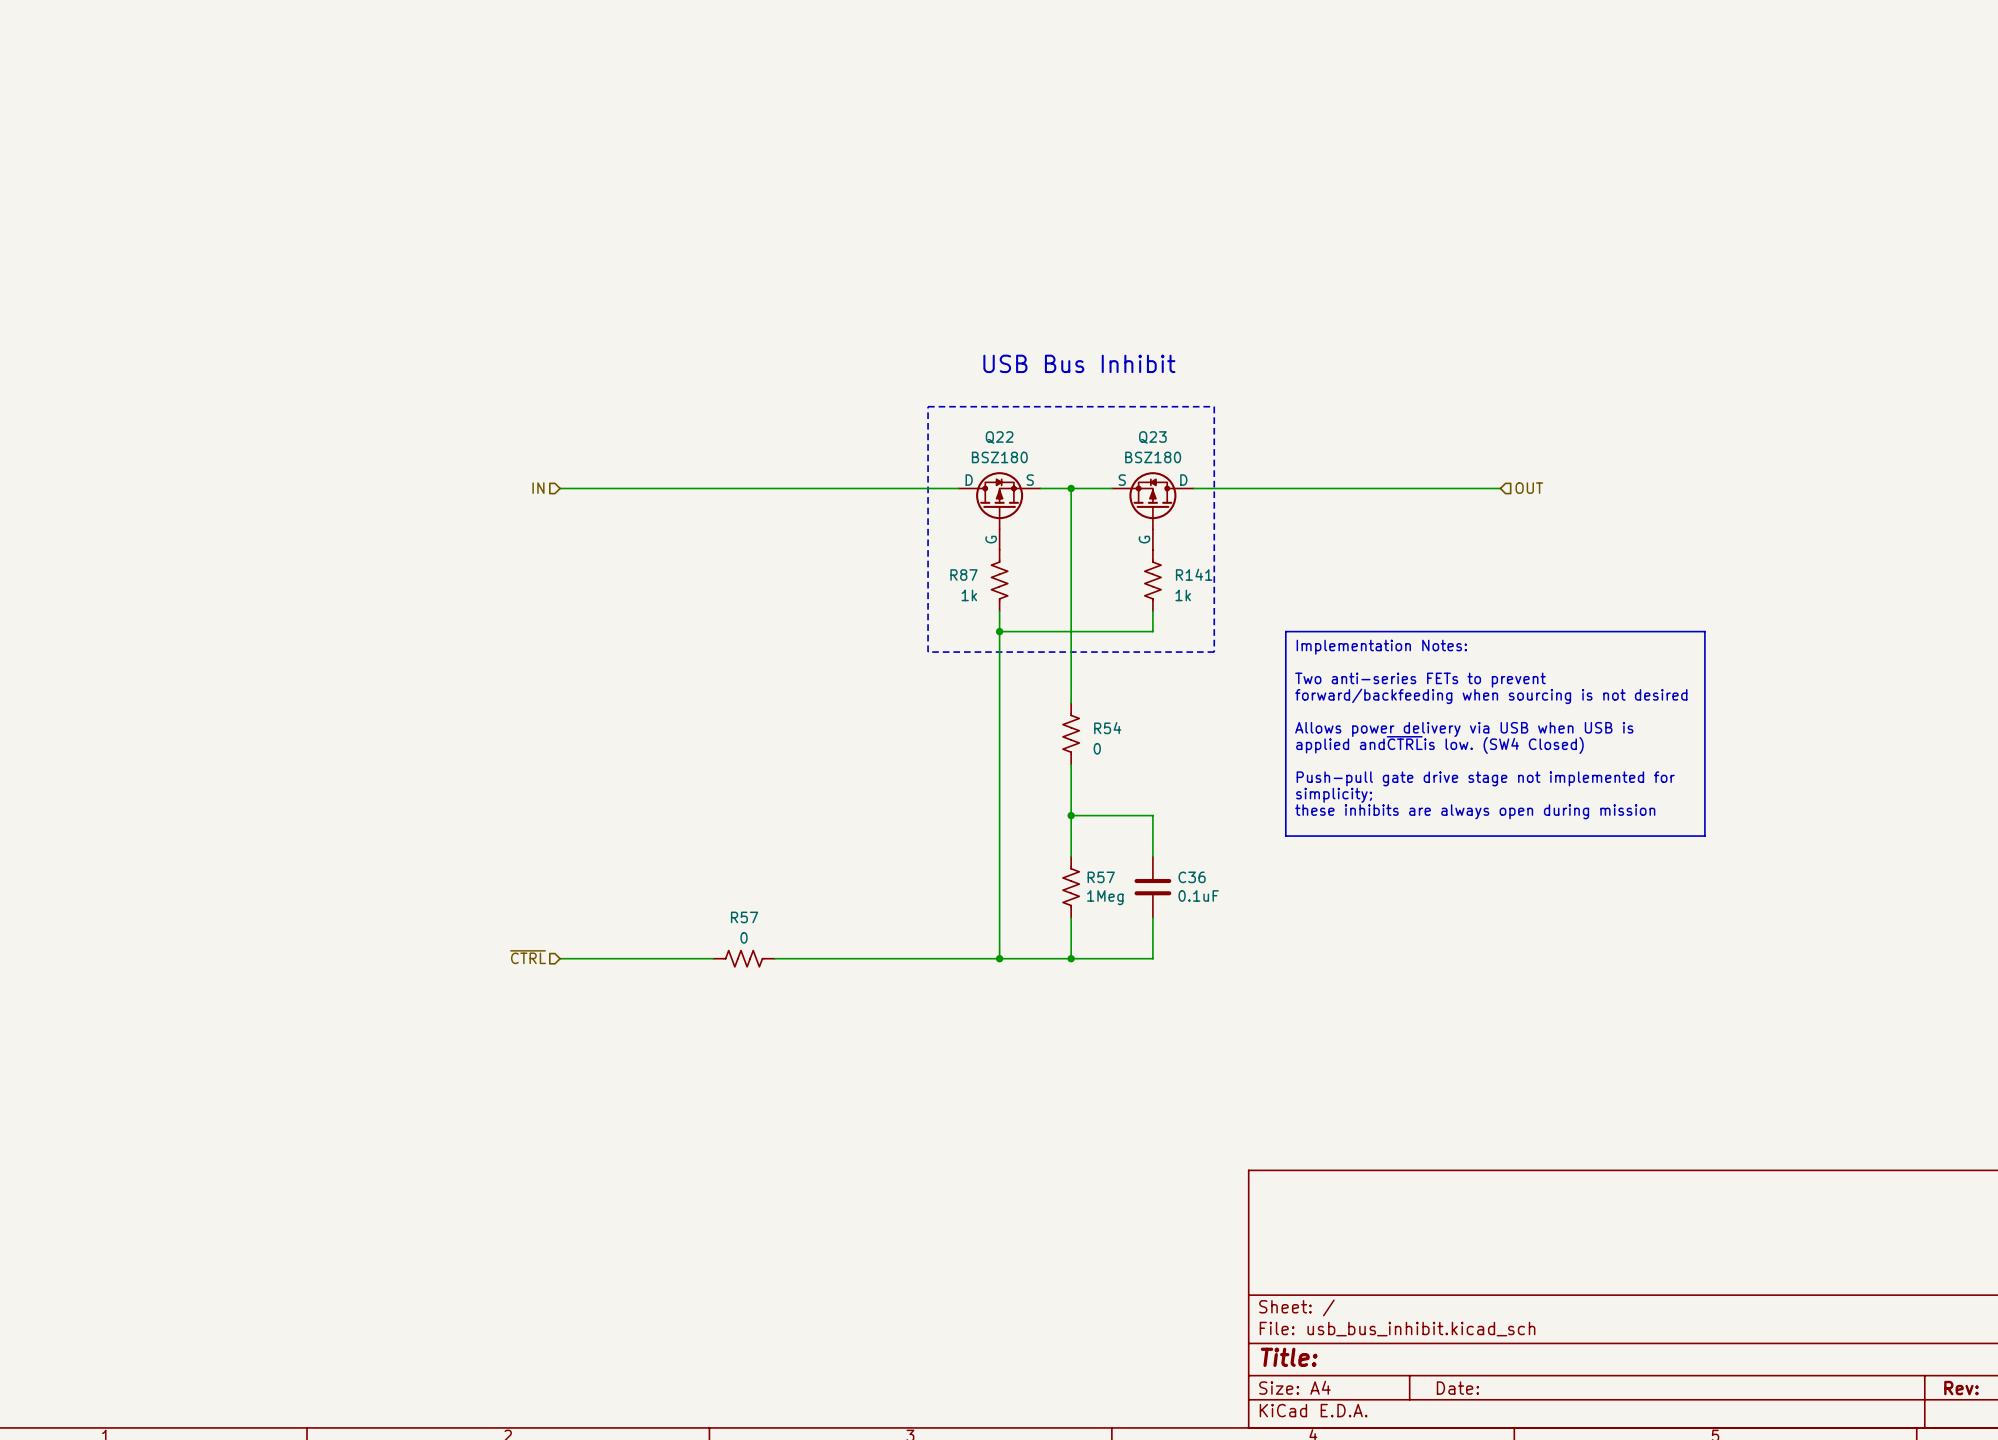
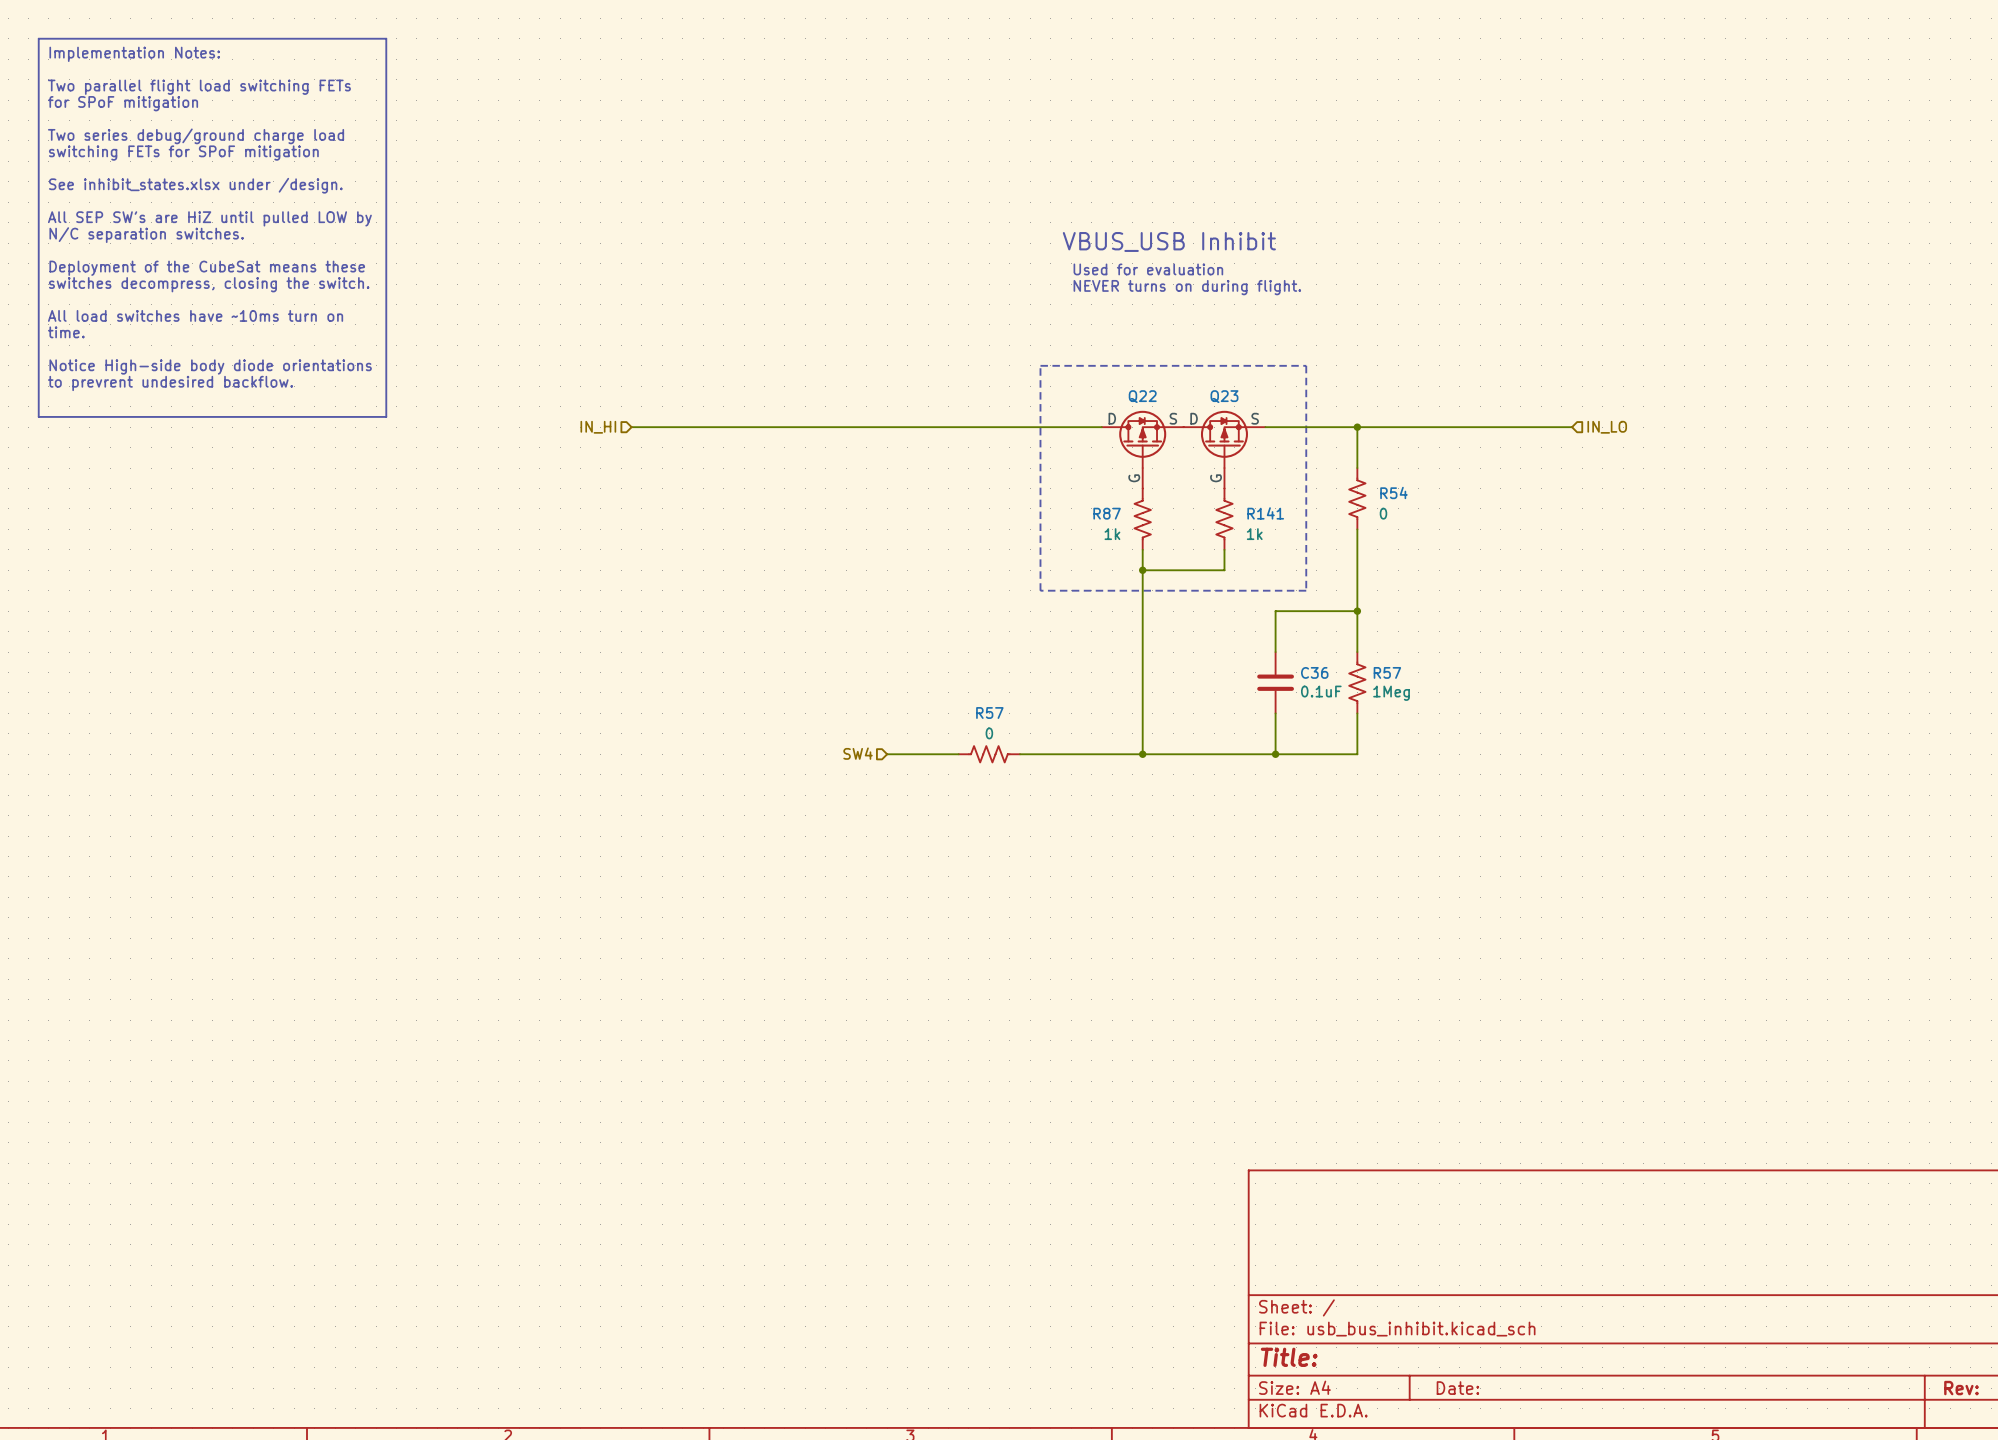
line: none -> (38, 38) (386, 38) (386, 416) (38, 416) (38, 38)
text: none -> Implementation Notes: (134, 54)
text: none -> Two parallel flight load switching FETs (199, 87)
text: none -> for SPoF mitigation (123, 103)
text: none -> Two series debug/ground charge load (196, 136)
text: none -> switching FETs for SPoF mitigation (183, 153)
text: none -> See inhibit_states.xlsx under /design. (195, 185)
text: none -> All SEP SW's are HiZ until pulled LOW by (209, 218)
text: none -> N/C separation switches. (146, 235)
text: none -> VBUS_USB Inhibit (1169, 241)
text: none -> Deployment of the CubeSat means these (207, 268)
text: none -> Used for evaluation (1148, 269)
text: none -> switches decompress, closing the switch. (209, 284)
text: none -> NEVER turns on during flight. (1187, 287)
text: none -> All load switches have ~10ms turn on (195, 315)
text: none -> time. (66, 332)
text: USB Bus Inhibit (1079, 363) -> none
line: none -> (1040, 365) (1306, 365) (1306, 590) (1040, 590) (1040, 365)
text: none -> Notice High-side body diode orientations (210, 367)
text: none -> to prevrent undesired backflow. (170, 383)
line: (928, 406) (1214, 406) (1214, 652) (928, 652) (928, 406) -> none
hierarchical label: none -> IN_HI (598, 427)
wire: none -> (631, 427) (1101, 427)
wire: none -> (1357, 427) (1357, 468)
junction: none -> (1357, 427)
hierarchical label: none -> IN_LO (1607, 427)
Q22 name position: Q22 (999, 437) -> Q22 (1142, 396)
Q23 name position: Q23 (1152, 437) -> Q23 (1224, 396)
Q22 value: BSZ180 (999, 457) -> none
Q23 value: BSZ180 (1153, 457) -> none
hierarchical label: IN (538, 488) -> none
wire: (560, 488) (958, 488) -> none
wire: (1040, 488) (1112, 488) -> none
wire: (1071, 488) (1071, 703) -> none
junction: (1071, 488) -> none
wire: (1193, 488) (1500, 488) -> (1265, 427) (1572, 427)
hierarchical label: OUT (1529, 488) -> none
Q23 flip: as is (1152, 500) -> left-right (1224, 439)
Q22 position: (999, 510) -> (1142, 449)
Q23 position: (1152, 510) -> (1224, 449)
wire: none -> (1357, 529) (1357, 652)
wire: none -> (1142, 549) (1142, 754)
wire: none -> (1224, 549) (1224, 570) (1142, 570)
junction: none -> (1142, 570)
R87 position: (999, 580) -> (1142, 519)
R141 position: (1152, 580) -> (1224, 519)
wire: (999, 611) (999, 958) -> none
wire: (1152, 611) (1152, 631) (999, 631) -> none
wire: none -> (1357, 611) (1275, 611) (1275, 652)
junction: none -> (1357, 611)
junction: (999, 631) -> none
line: (1285, 631) (1704, 631) (1704, 836) (1285, 836) (1285, 631) -> none
text: Implementation Notes: (1381, 647) -> none
text: Two anti-series FETs to prevent (1420, 680) -> none
R57: none -> 1Meg (1357, 682)
text: forward/backfeeding when sourcing is not desired (1491, 696) -> none
wire: none -> (1275, 713) (1275, 754)
wire: none -> (1357, 713) (1357, 754) (1020, 754)
text: Allows power delivery via USB when USB is (1464, 729) -> none
R54 position: (1071, 733) -> (1357, 498)
text: applied and~{CTRL}is low. (SW4 Closed) (1439, 745) -> none
hierarchical label: none -> SW4 (858, 753)
wire: none -> (887, 754) (958, 754)
R57: none -> 0 (989, 754)
junction: none -> (1142, 754)
junction: none -> (1275, 754)
wire: (1071, 764) (1071, 856) -> none
text: Push-pull gate drive stage not implemented for (1485, 778) -> none
text: simplicity; (1334, 795) -> none
text: these inhibits are always open during mission (1475, 811) -> none
wire: (1071, 815) (1152, 815) (1152, 856) -> none
junction: (1071, 815) -> none
R57: 1Meg (1071, 887) -> none
C36 position: (1152, 887) -> (1275, 682)
wire: (1071, 917) (1071, 958) -> none
wire: (1152, 917) (1152, 958) (774, 958) -> none
hierarchical label: ~{CTRL} (528, 957) -> none
wire: (560, 958) (713, 958) -> none
R57: 0 (744, 958) -> none
junction: (999, 958) -> none
junction: (1071, 958) -> none

